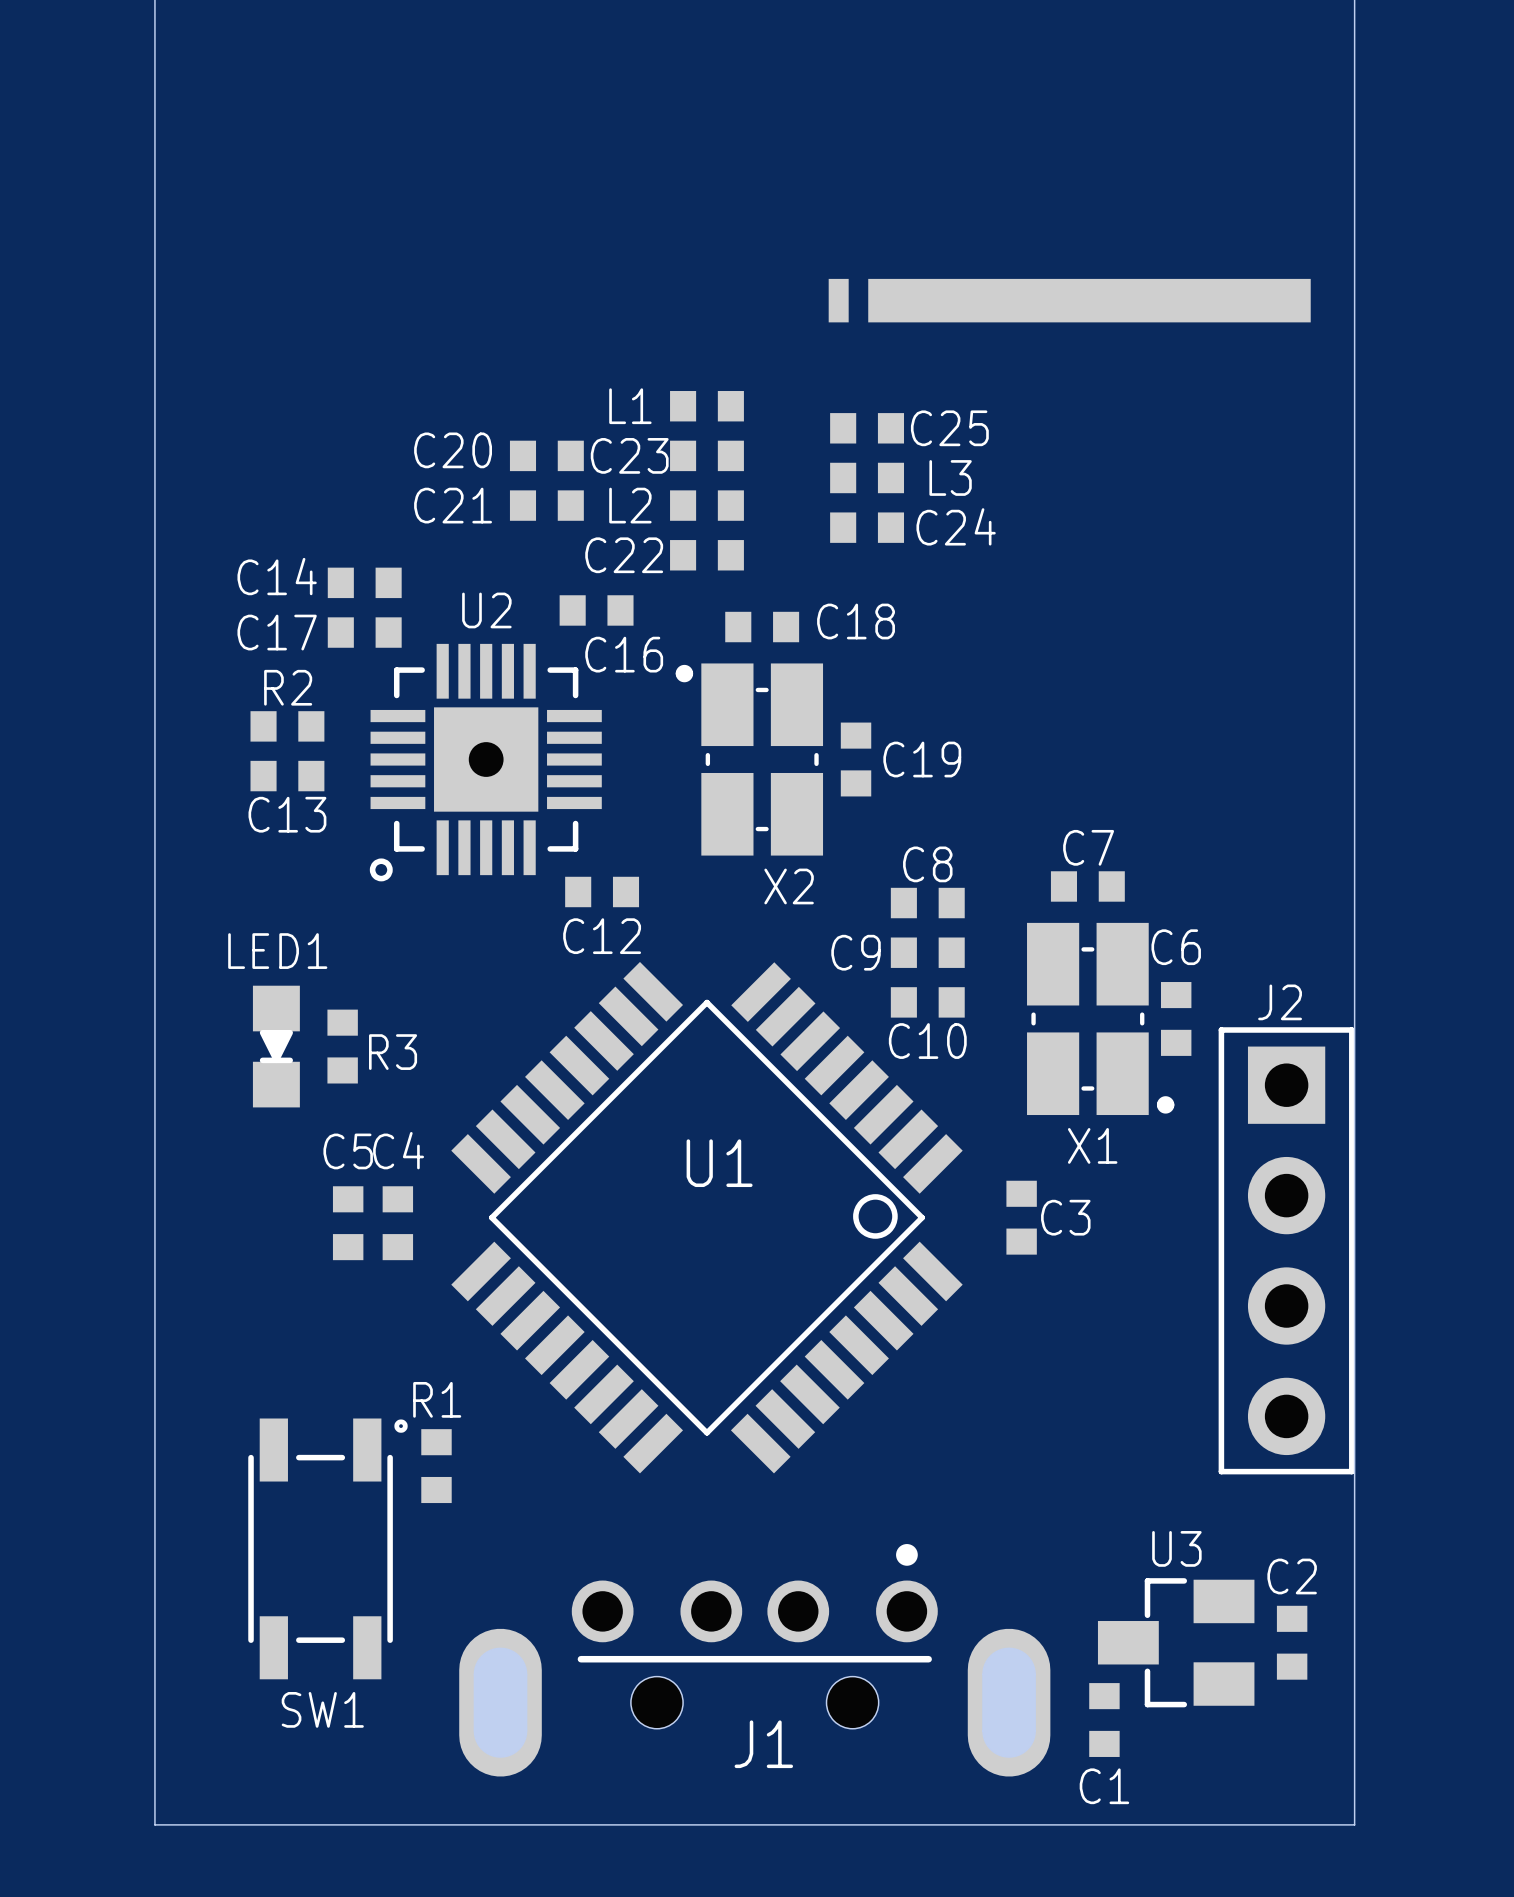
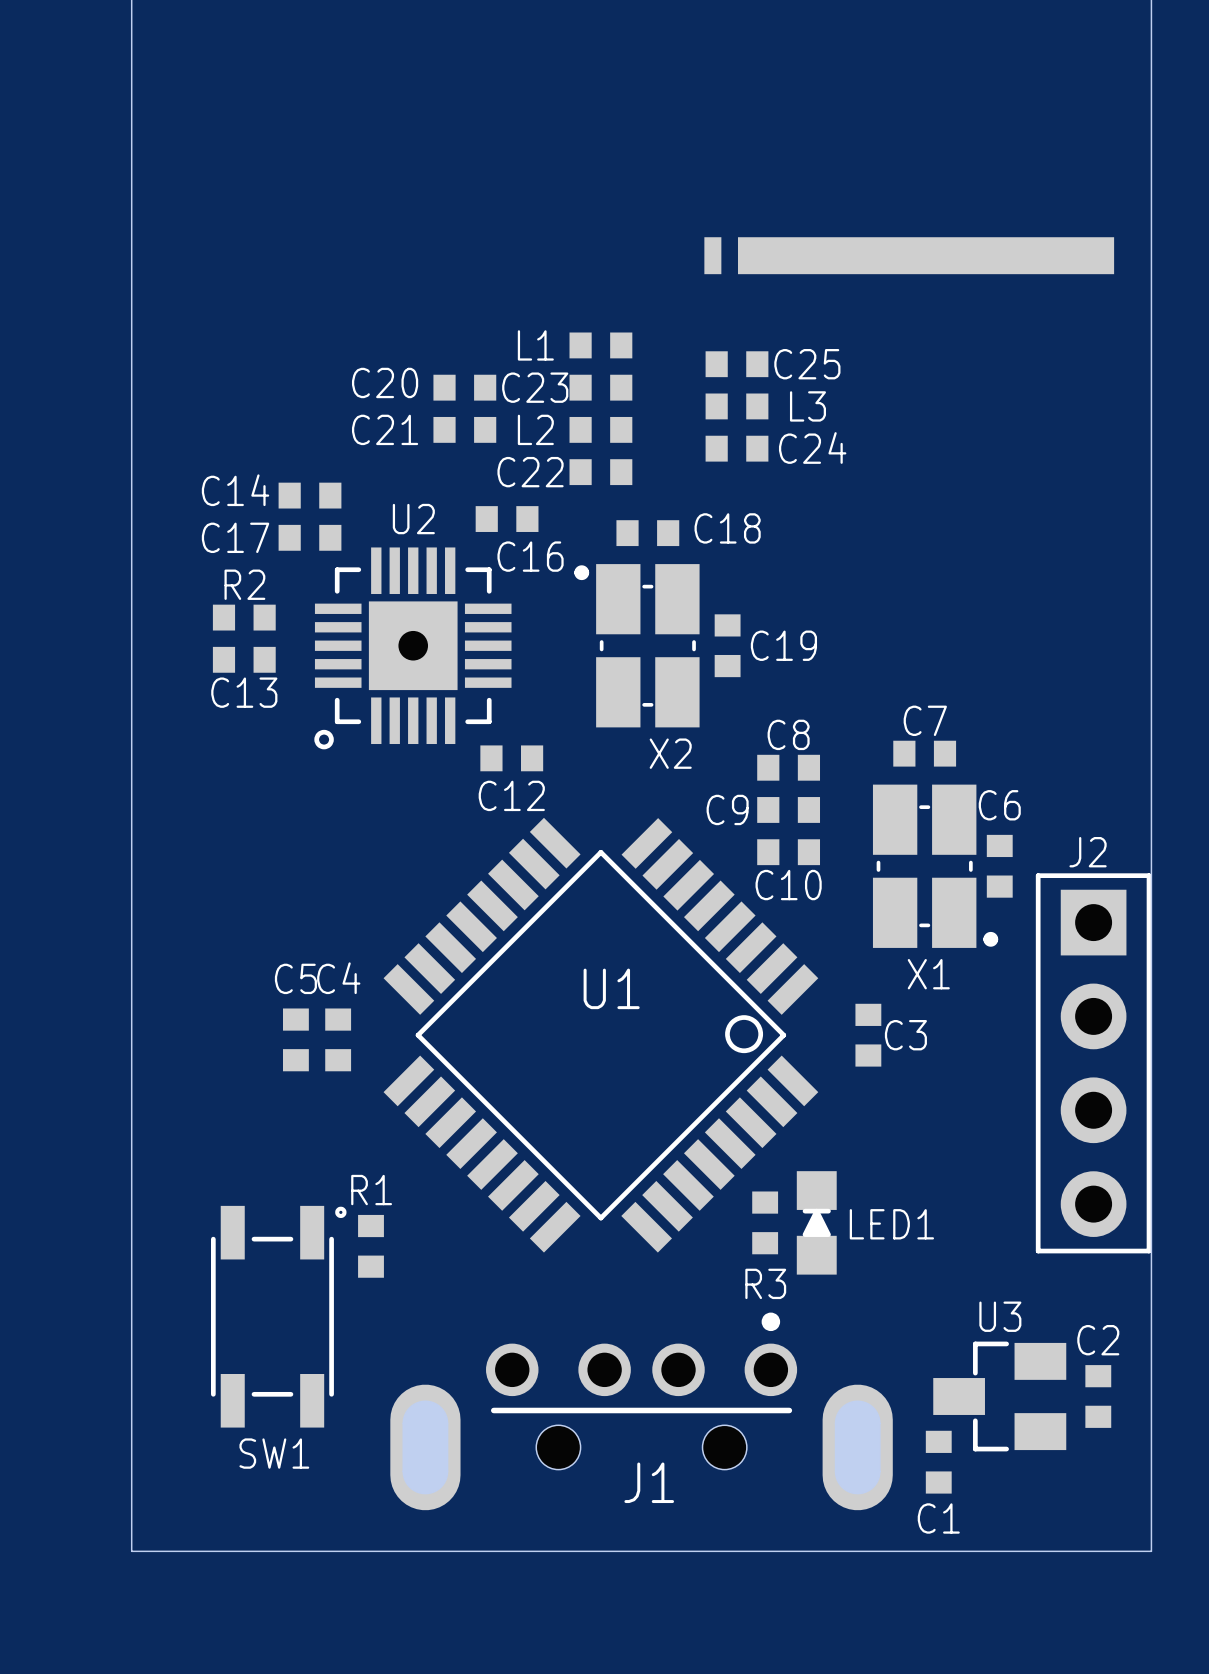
LED1 name position: LED1 (277, 951) -> LED1 (891, 1224)
LED1 rotation: 0° (276, 1046) -> 180° (816, 1222)
LED1 position: (276, 1046) -> (816, 1222)
R3 position: (342, 1046) -> (765, 1222)
R3 name position: R3 (393, 1052) -> R3 (765, 1283)

